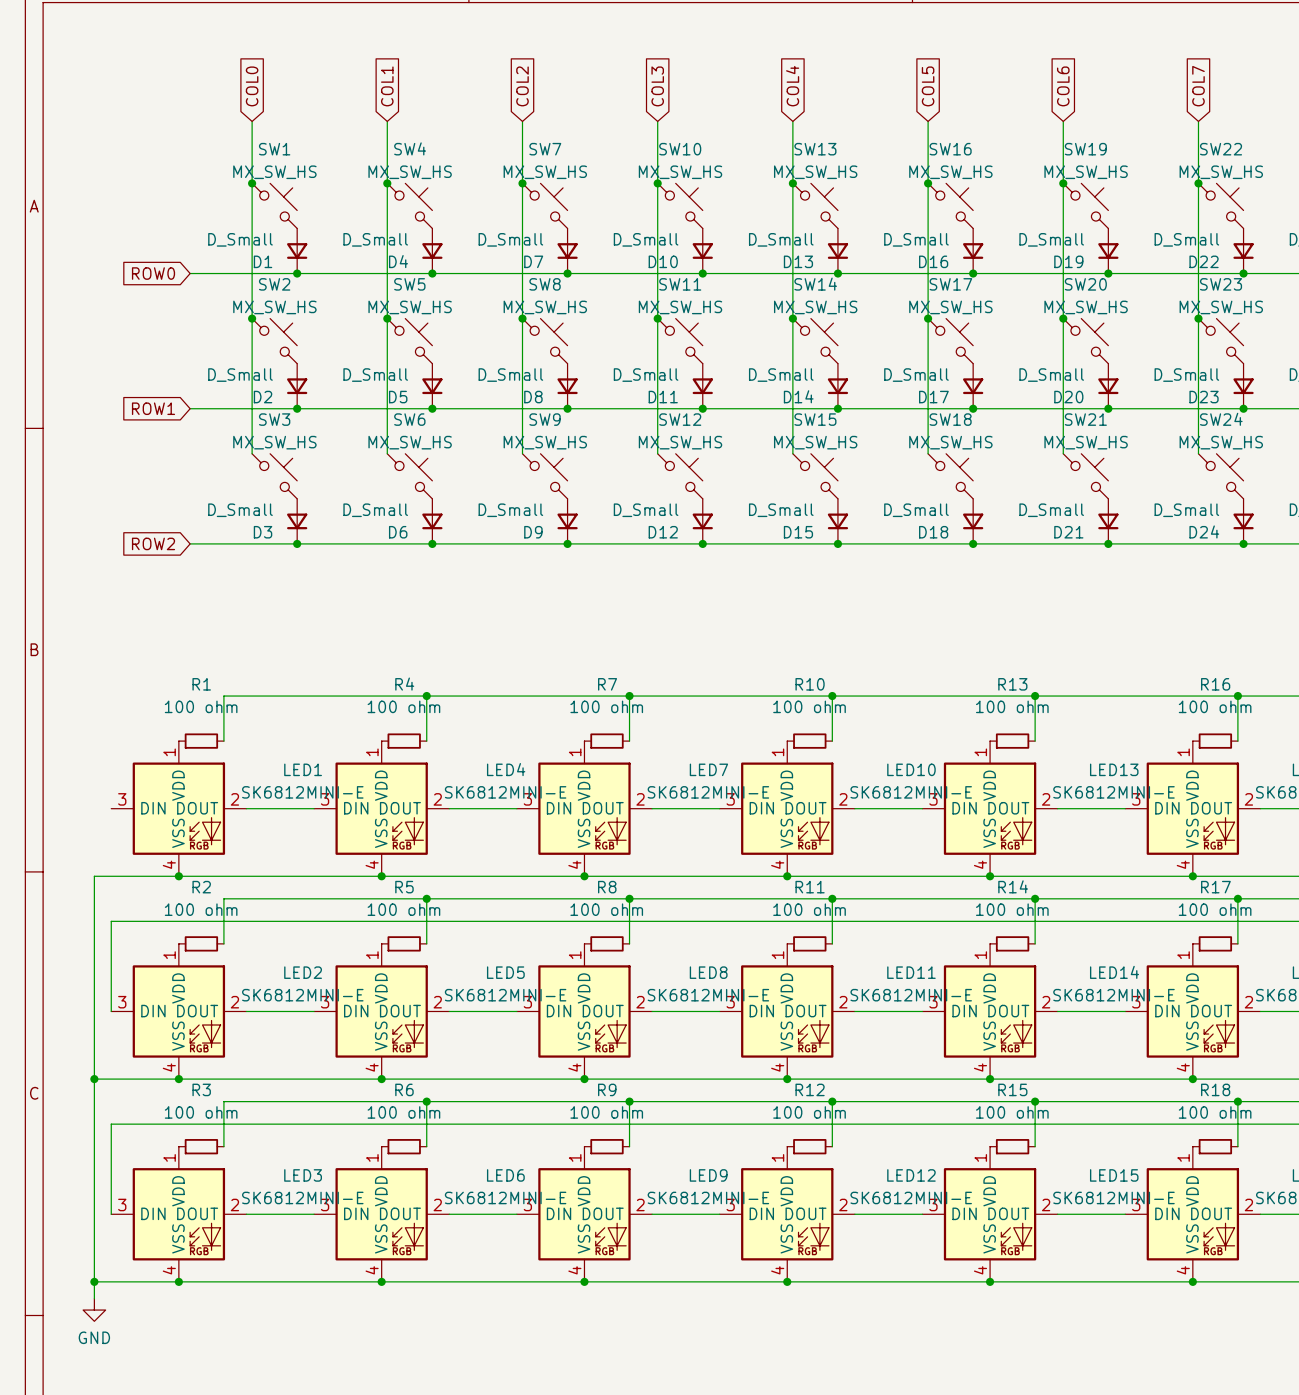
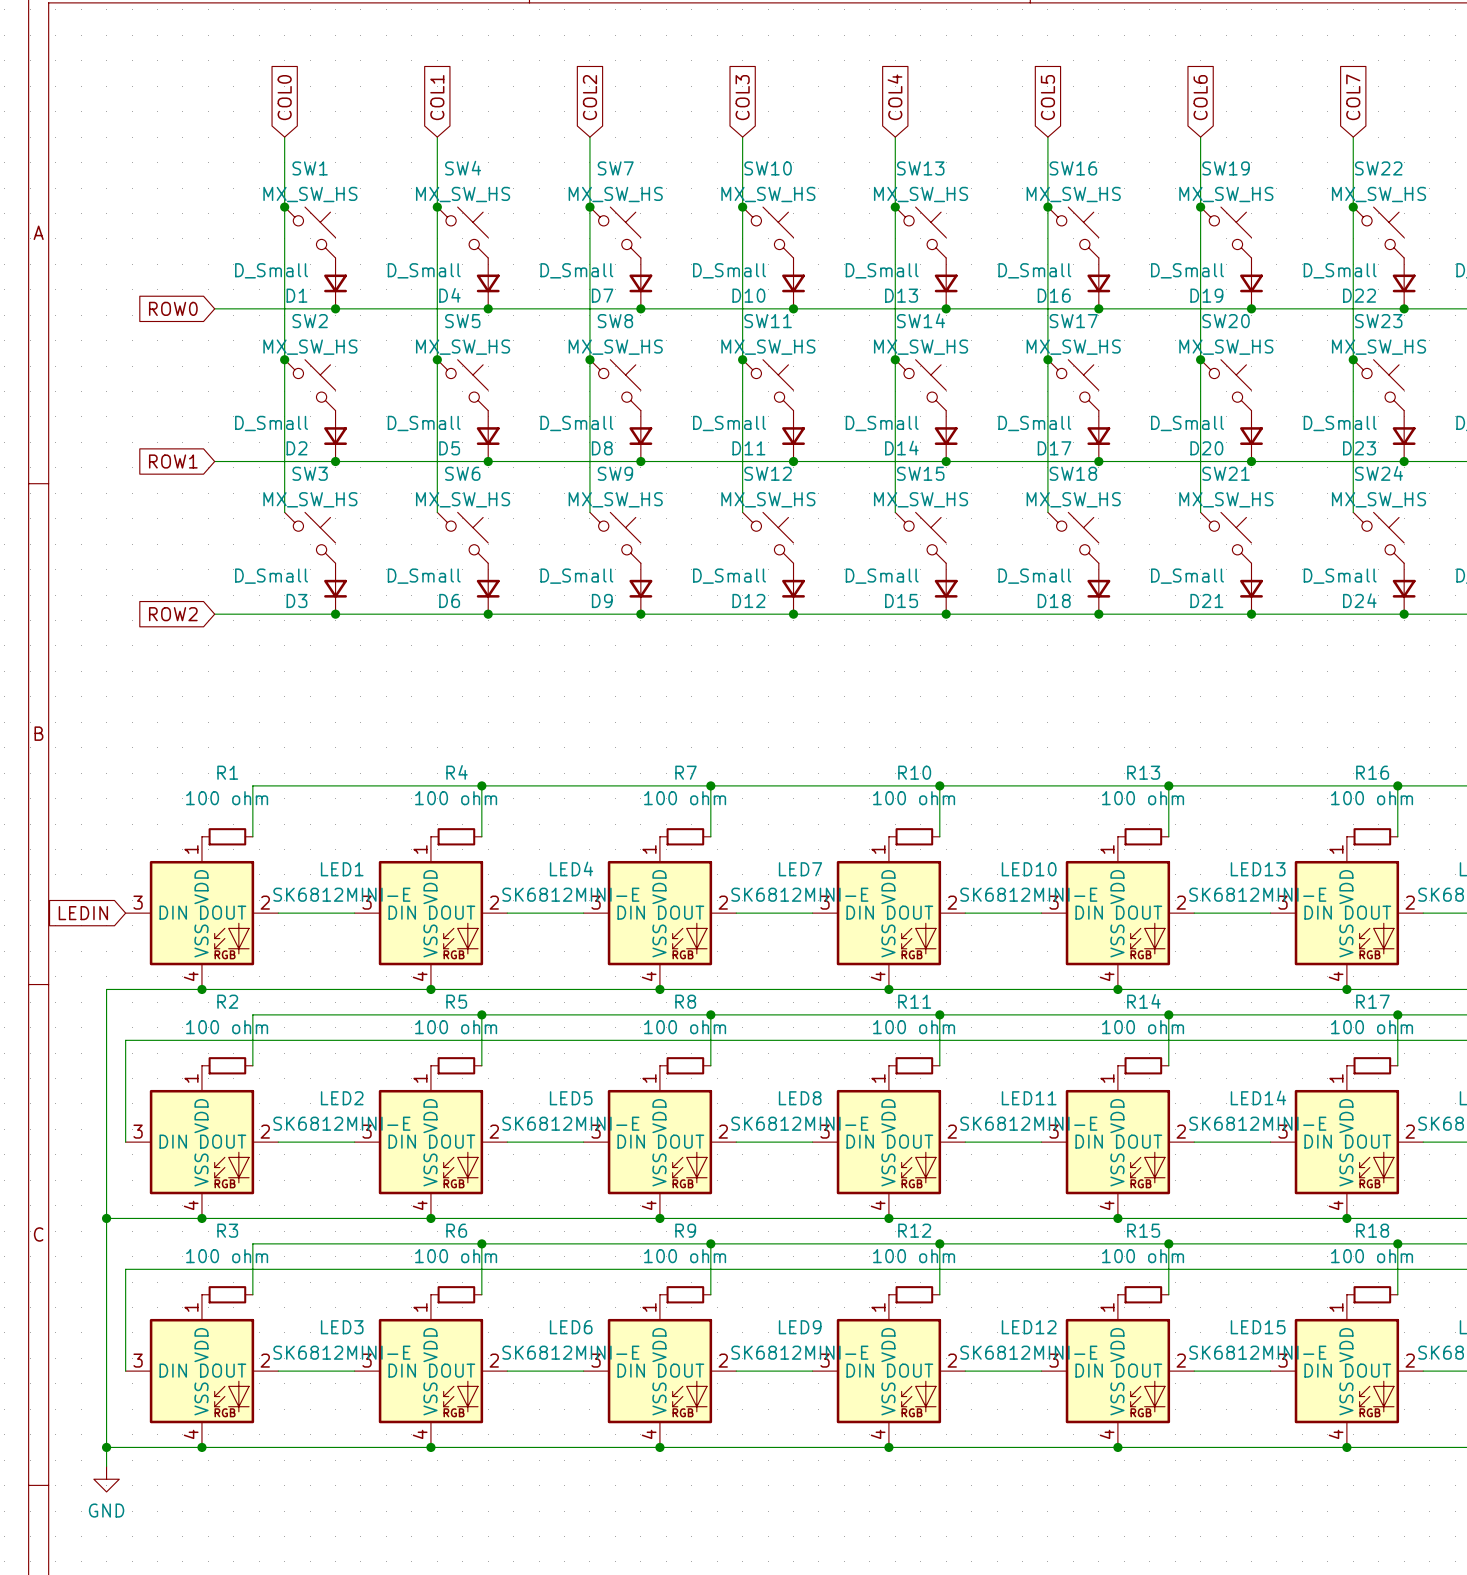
global label: none -> LEDIN (83, 913)

